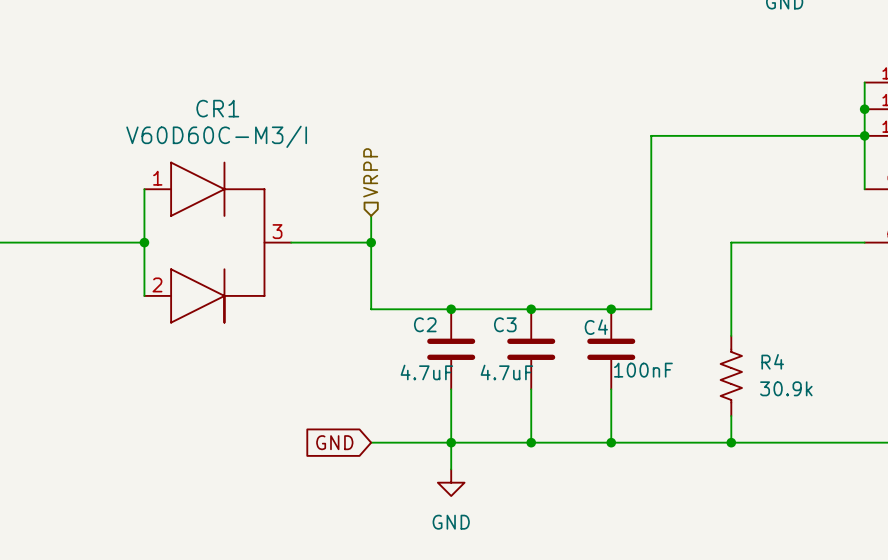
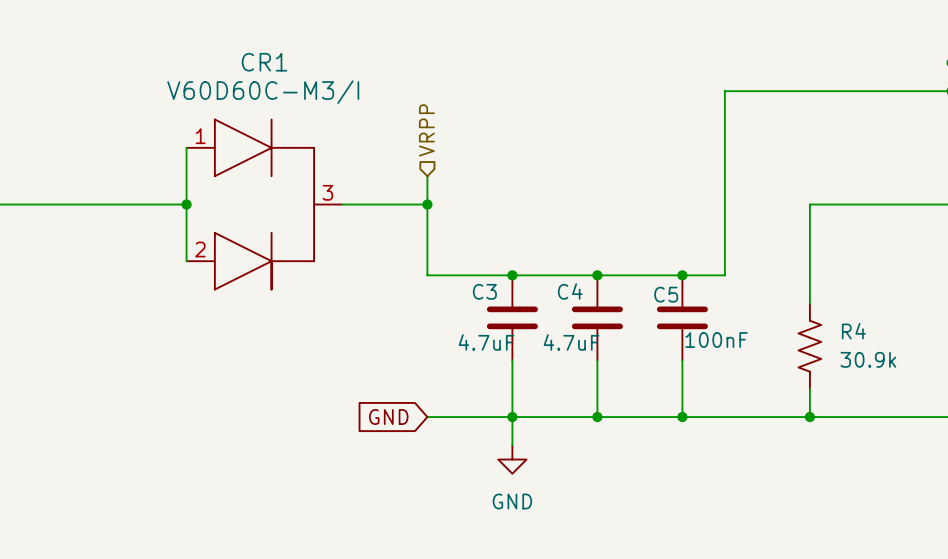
C2 name: C2 (425, 324) -> C3 (484, 291)
C3 name: C3 (505, 324) -> C4 (570, 291)
C4 name: C4 (596, 327) -> C5 (666, 294)

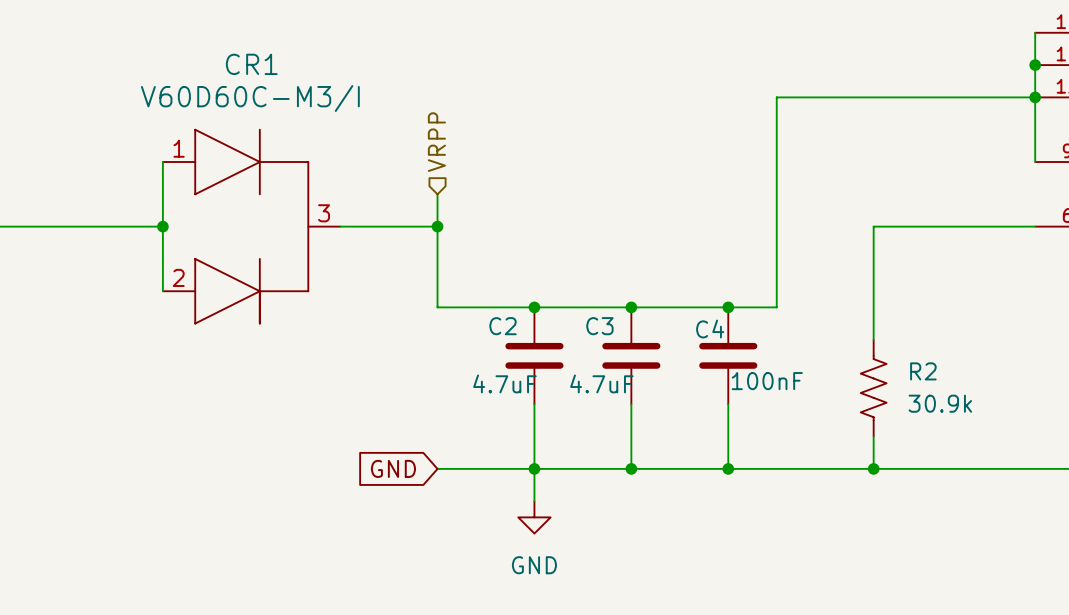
C3 name: C3 (484, 291) -> C2 (503, 326)
C4 name: C4 (570, 291) -> C3 (599, 326)
C5 name: C5 (666, 294) -> C4 (710, 329)
R4 name: R4 (853, 331) -> R2 (923, 371)

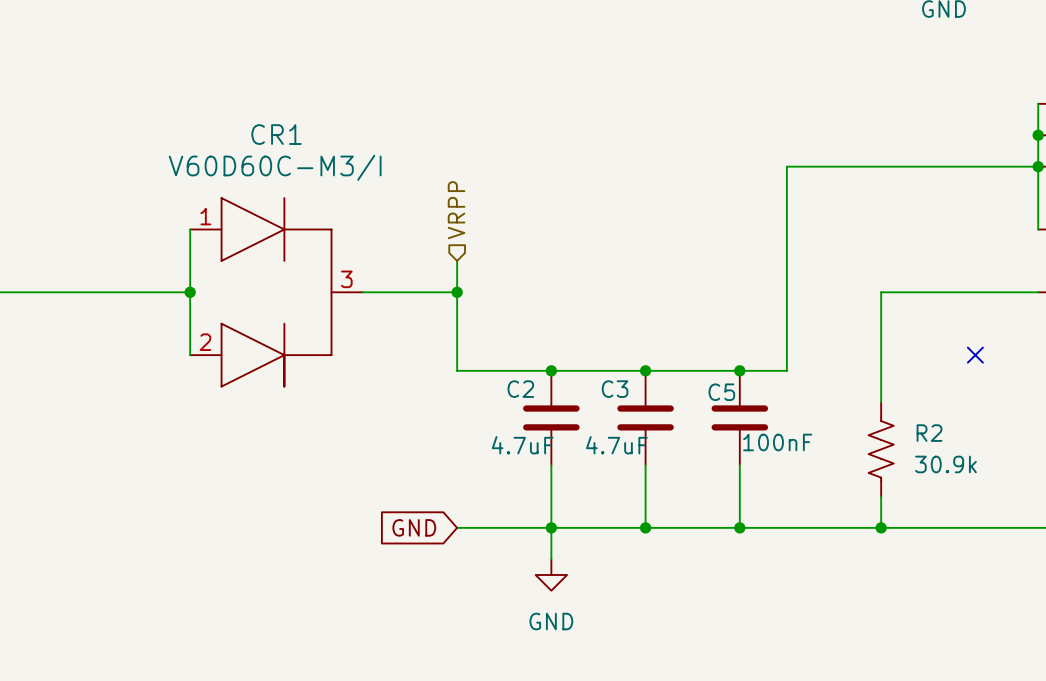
no-connect mark: none -> (975, 355)
C4 name: C4 (710, 329) -> C5 (721, 392)

